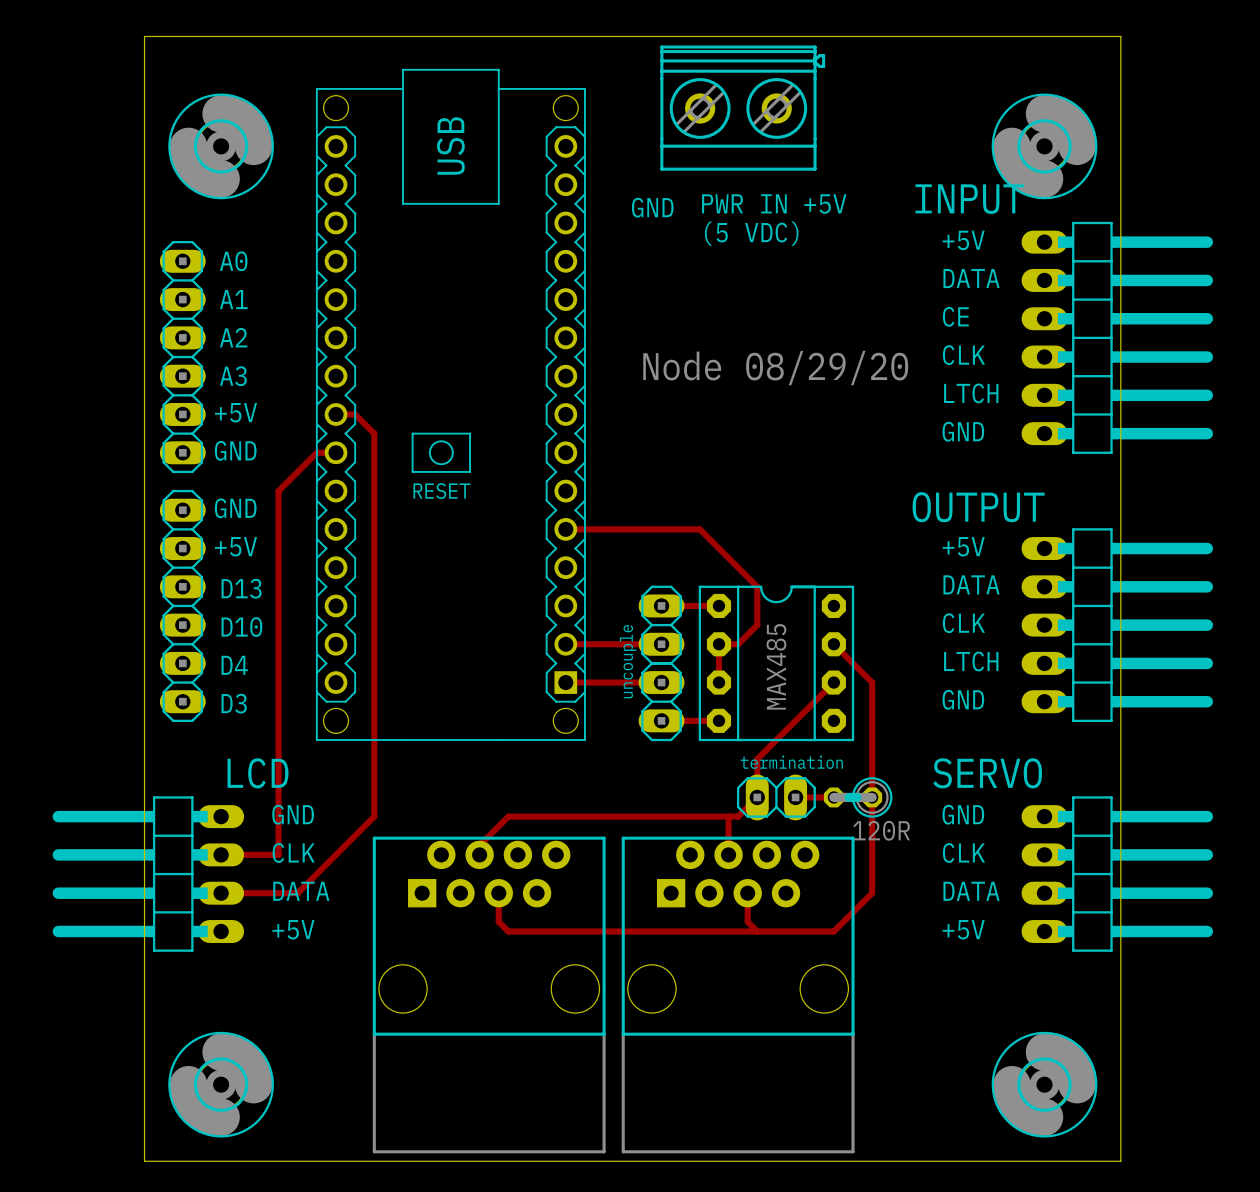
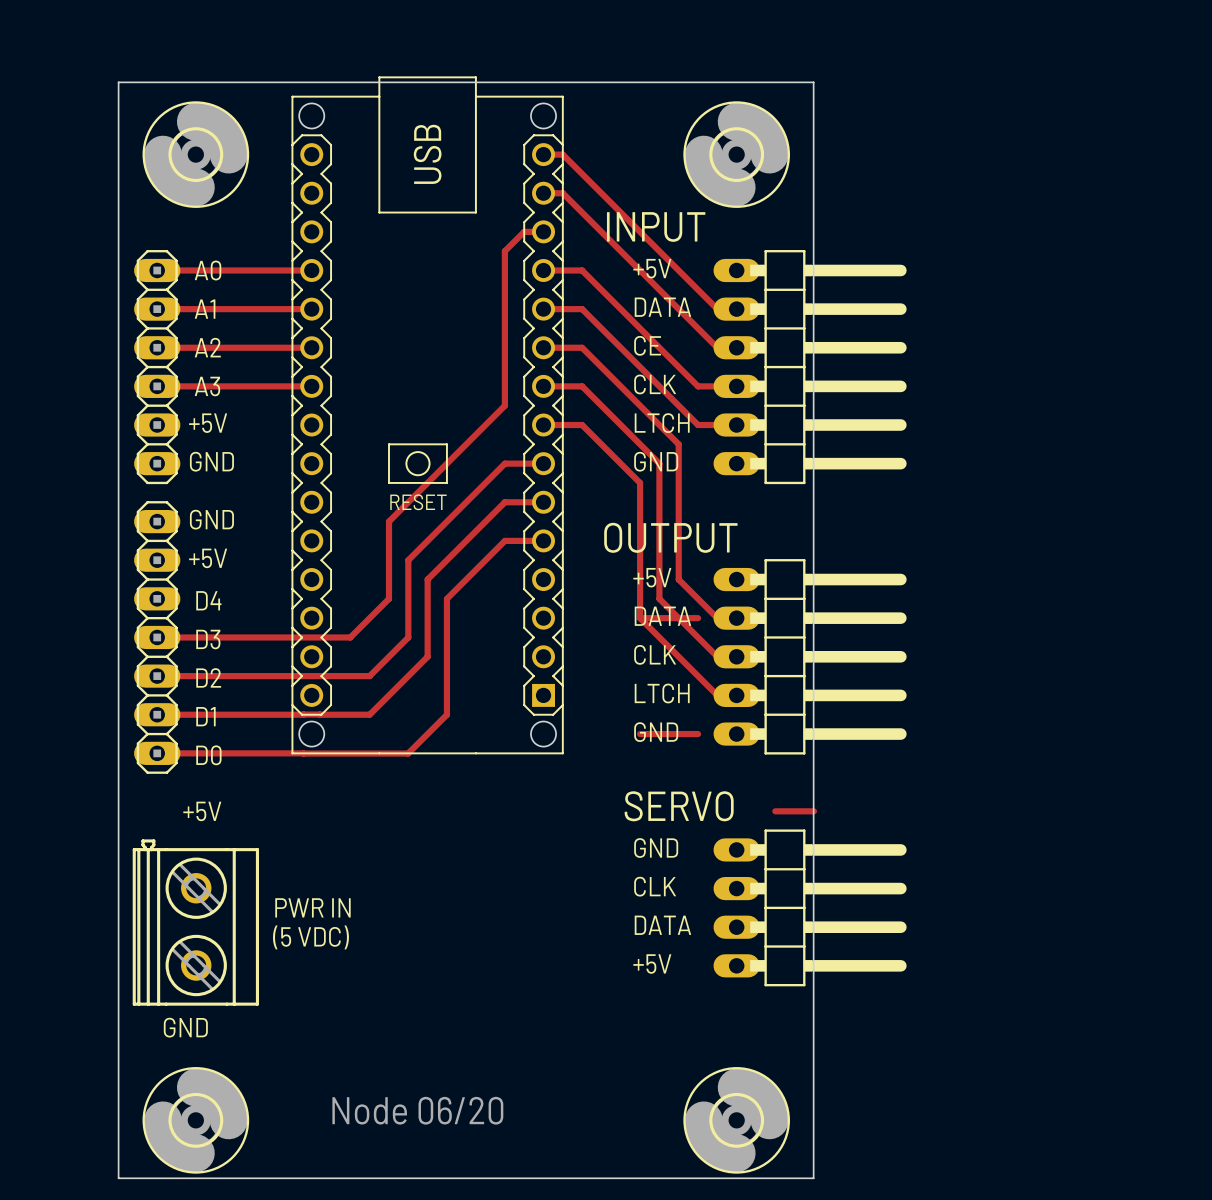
board edge: (144, 74) (144, 36) (1120, 36) (1120, 1161) (833, 1161) -> (118, 82) (813, 82) (813, 1178)
part: (742, 108) -> none
track: none -> (543, 154) (562, 154) (717, 309) (736, 309)
part position: (1044, 146) -> (736, 154)
track: none -> (543, 193) (562, 193) (717, 347) (736, 347)
text position: INPUT (969, 199) -> INPUT (656, 226)
text: PWR IN (744, 203) -> none
text: +5V (825, 204) -> none
text: GND (652, 207) -> none
track: none -> (543, 231) (524, 231) (504, 251) (504, 405) (389, 521) (389, 598) (350, 637) (157, 637)
text: (5 VDC) (751, 233) -> none
text: +5V (963, 240) -> none
text: none -> +5V (652, 268)
track: none -> (157, 270) (311, 270)
track: none -> (543, 270) (582, 270) (698, 386) (736, 386)
text: DATA (971, 278) -> none
text: none -> DATA (662, 307)
track: none -> (157, 309) (311, 309)
track: none -> (543, 309) (582, 309) (698, 425) (736, 425)
text position: CE (955, 316) -> CE (647, 345)
track: none -> (157, 347) (311, 347)
track: none -> (543, 347) (582, 347) (678, 444) (678, 579) (717, 618) (736, 618)
part position: (1117, 337) -> (810, 367)
text: CLK (963, 355) -> none
text: Node 08/29/20 (775, 368) -> CLK (655, 384)
track: none -> (157, 386) (311, 386)
track: none -> (543, 386) (582, 386) (659, 463) (659, 598) (717, 656) (736, 656)
text: LTCH (971, 393) -> none
text: none -> LTCH (662, 423)
track: (336, 414) (355, 414) (374, 433) (374, 816) (297, 893) (221, 893) -> none
track: none -> (543, 425) (582, 425) (640, 482) (640, 618) (717, 695) (736, 695)
text: GND (963, 431) -> none
text: none -> GND (656, 461)
track: (336, 452) (316, 452) (278, 491) (278, 854) (221, 854) -> none
track: none -> (543, 463) (504, 463) (408, 560) (408, 637) (369, 676) (157, 676)
track: none -> (543, 502) (504, 502) (427, 579) (427, 656) (369, 714) (320, 714)
text position: OUTPUT (978, 507) -> OUTPUT (670, 537)
track: (565, 529) (699, 529) (757, 586) (757, 625) (738, 644) (718, 644) (718, 682) -> (543, 540) (504, 540) (446, 598) (446, 714) (408, 753) (303, 753)
text: +5V (963, 546) -> none
text: none -> +5V (652, 577)
text: DATA (971, 584) -> none
text: D13 (241, 588) -> D4 (208, 600)
text: none -> DATA (662, 616)
part: (182, 605) -> none
text: CLK (963, 623) -> none
part: none -> (157, 637)
part: (661, 625) -> none
part position: (1117, 625) -> (810, 656)
text: D10 (241, 627) -> D3 (208, 639)
text: none -> CLK (655, 654)
track: (565, 644) (661, 644) -> none
track: (833, 644) (872, 682) (872, 893) (833, 931) (508, 931) (498, 921) (498, 893) -> none
text: uncouple (628, 661) -> none
text: LTCH (971, 661) -> none
part: MAX485 (776, 663) -> none
text: D4 (234, 665) -> D2 (208, 677)
text: none -> LTCH (662, 693)
track: (565, 682) (661, 682) -> none
track: (833, 682) (757, 759) (757, 797) (738, 816) (508, 816) (479, 845) (479, 854) -> none
text: GND (963, 699) -> none
track: none -> (157, 714) (303, 714)
track: none -> (303, 714) (319, 714)
part: (661, 701) -> none
text: D3 (234, 703) -> D1 (205, 716)
text: none -> GND (656, 732)
track: none -> (157, 753) (303, 753)
text: none -> D0 (208, 755)
text: termination (791, 762) -> none
text: LCD (258, 773) -> none
text position: SERVO (987, 773) -> SERVO (679, 806)
part: (776, 797) -> none
part: 120R (858, 797) -> none
text position: GND (293, 814) -> GND (185, 1027)
text: GND (963, 814) -> none
track: (730, 816) (728, 818) (728, 854) -> none
text: none -> GND (656, 848)
text: CLK (293, 852) -> none
text: CLK (963, 852) -> none
text: none -> CLK (655, 886)
part: (148, 874) -> none
part position: (1117, 874) -> (810, 907)
text: DATA (301, 891) -> none
text: DATA (971, 891) -> none
text: none -> PWR IN (312, 907)
track: (747, 893) (747, 921) (757, 931) -> none
part: none -> (195, 922)
text: none -> DATA (662, 925)
text: none -> (5 VDC) (310, 937)
text position: +5V (293, 929) -> +5V (202, 811)
text: +5V (963, 929) -> none
text: none -> +5V (652, 964)
part: (489, 994) -> none
part: (738, 994) -> none
part position: (221, 1084) -> (195, 1120)
part: (1044, 1084) -> none
text: none -> Node 06/20 (417, 1110)
part: none -> (736, 1120)

